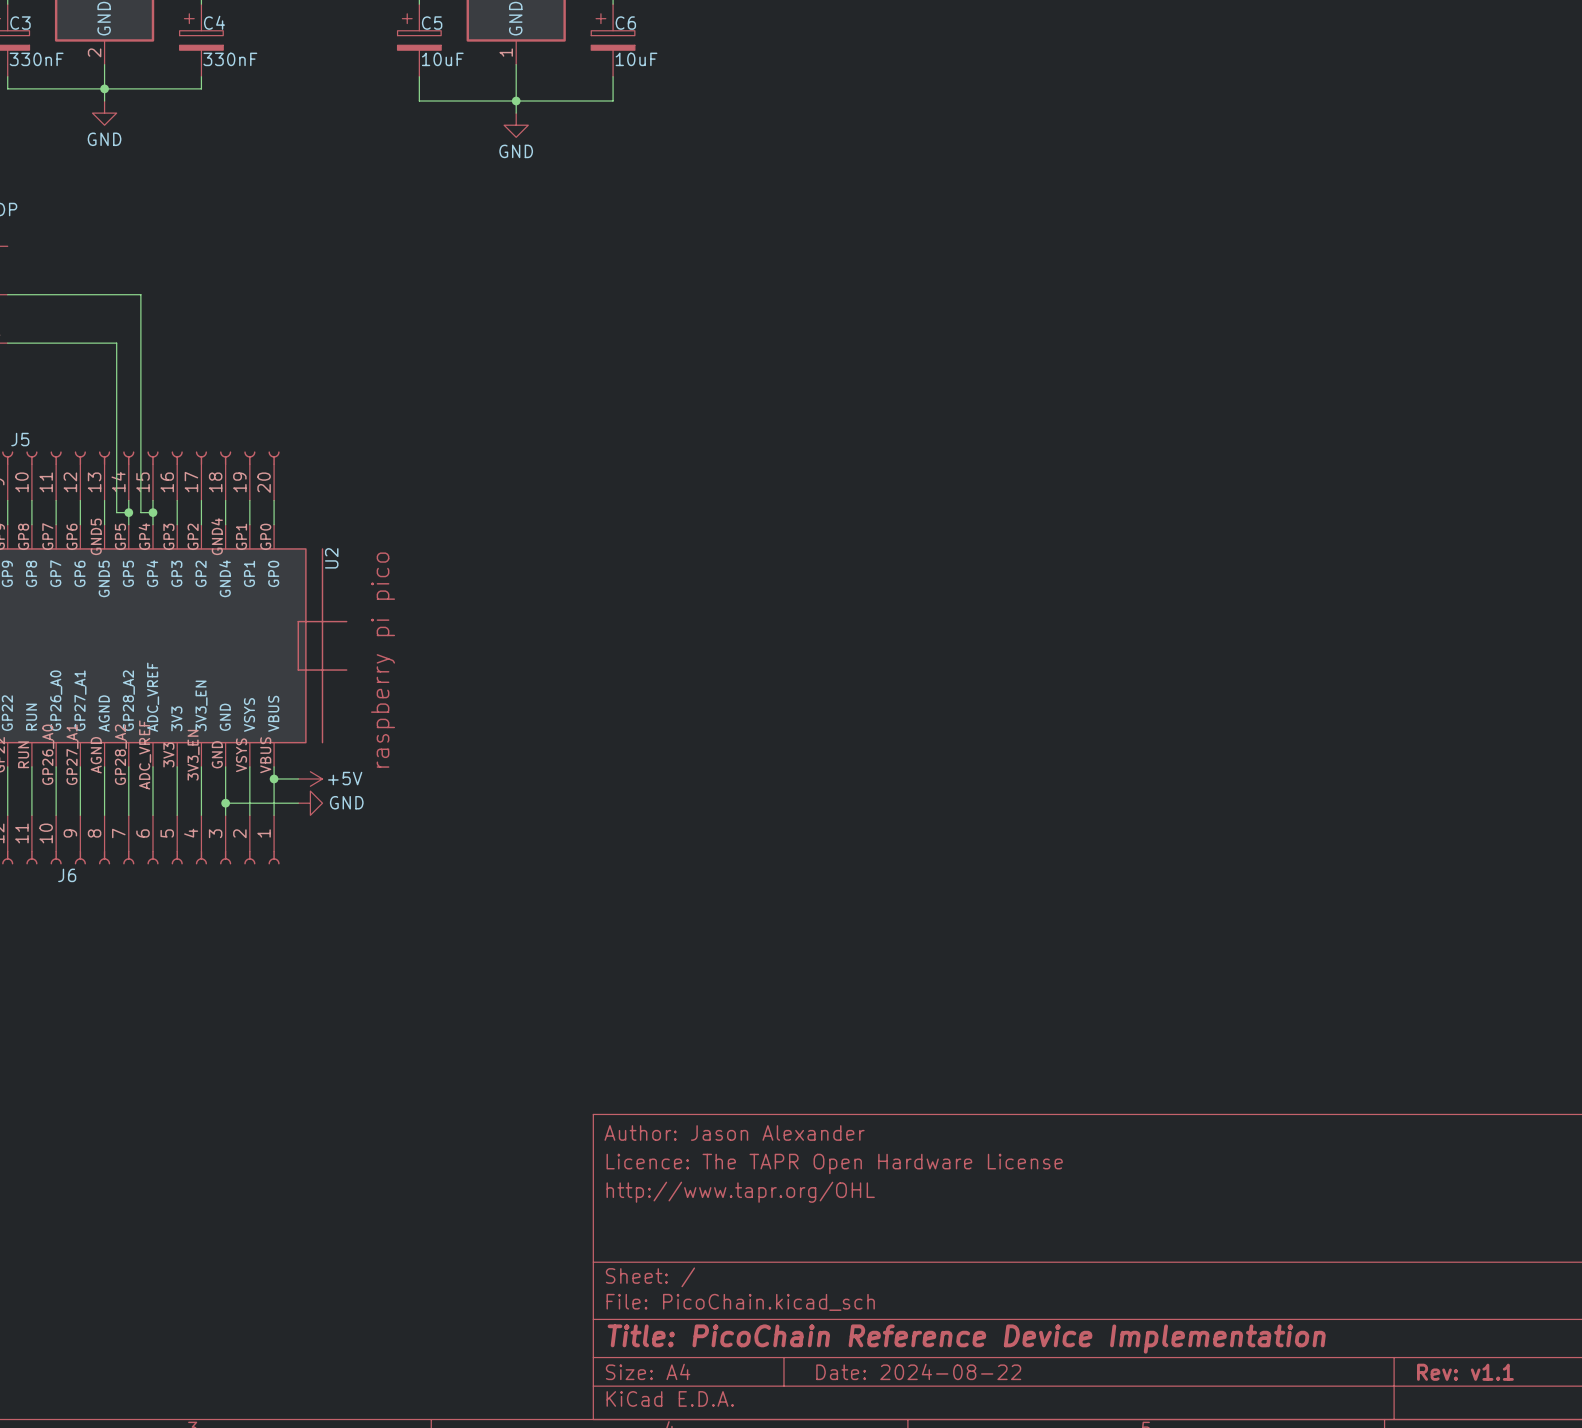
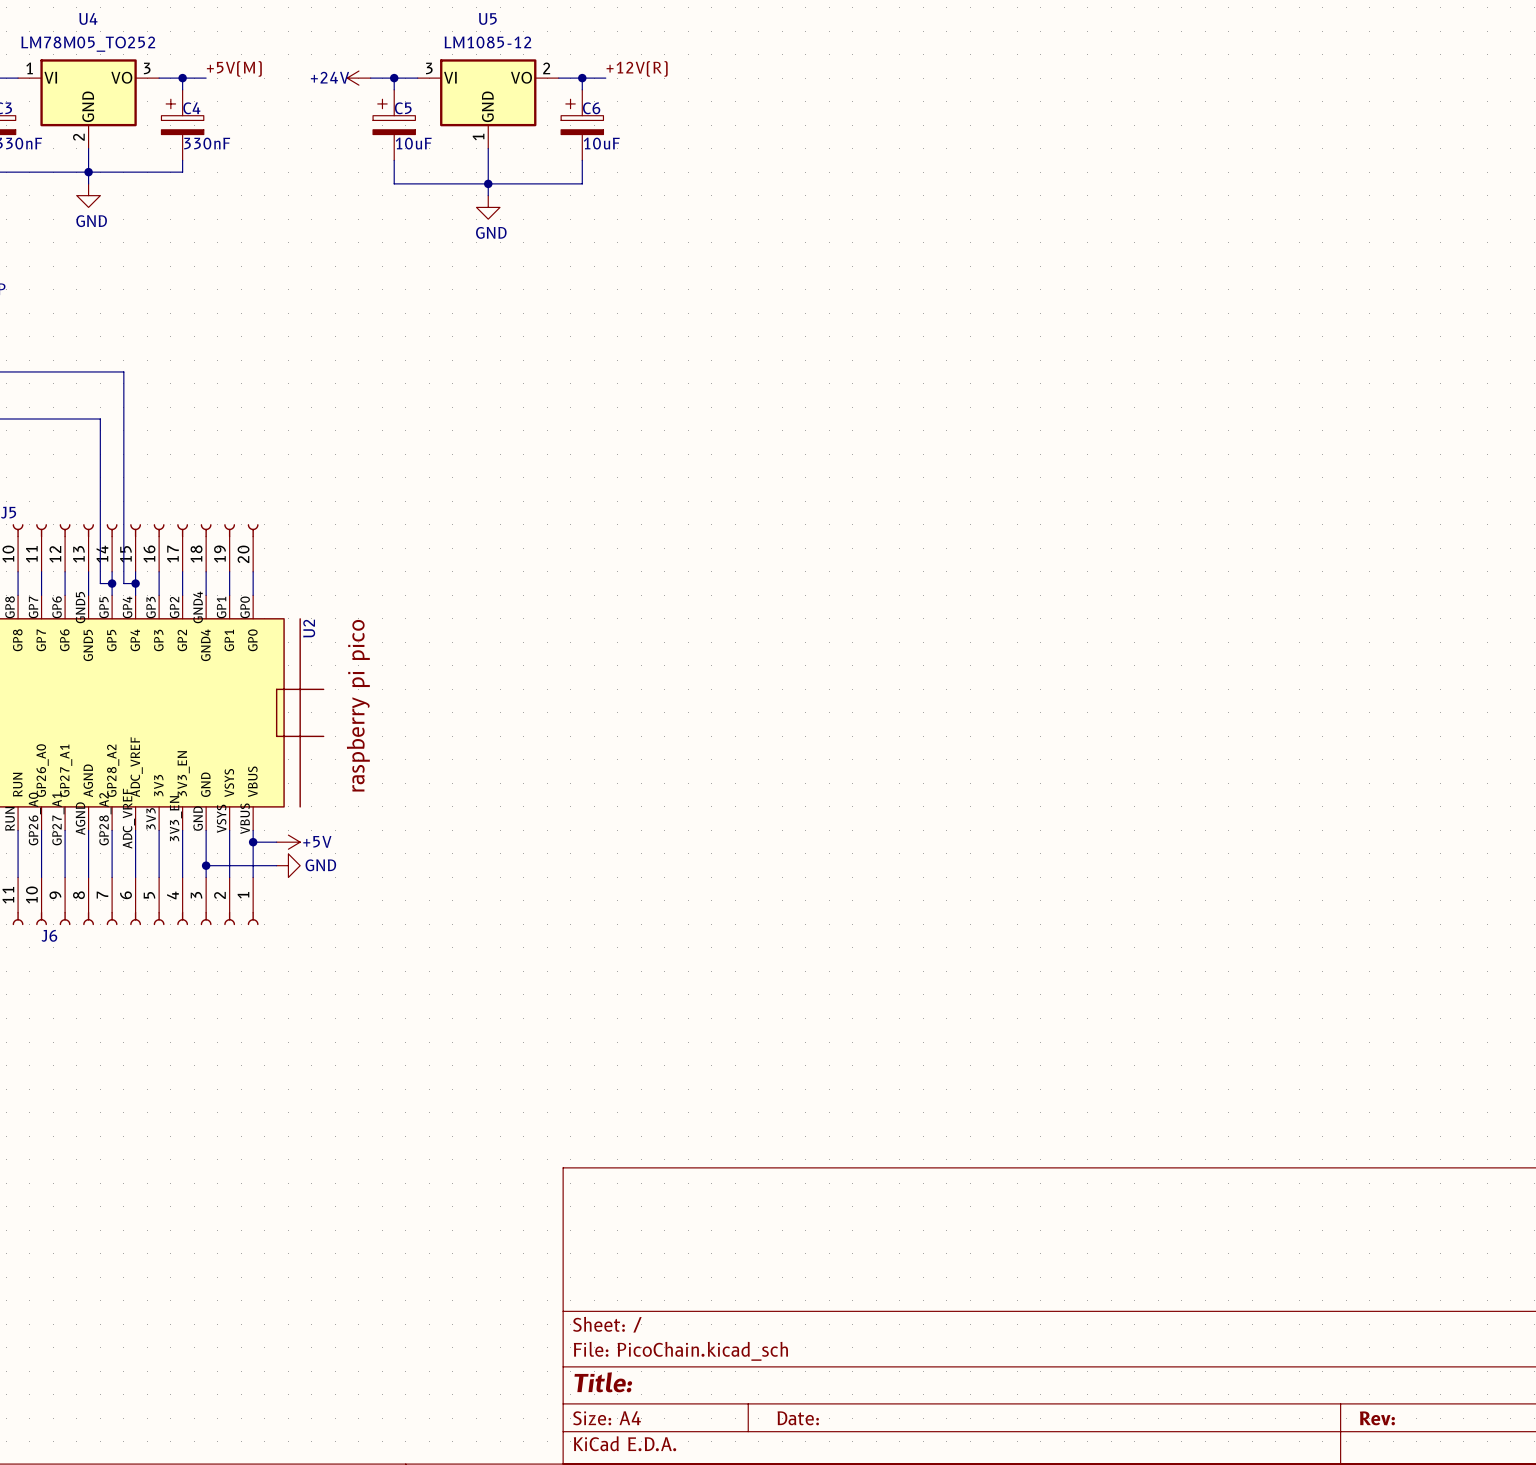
title block: Author: Jason Alexander (734, 1132) -> none
title block: Licence: The TAPR Open Hardware License (834, 1163) -> none
title block: http://www.tapr.org/OHL (740, 1192) -> none
title block: Title: PicoChain Reference Device Implementation (966, 1339) -> Title: (603, 1382)
title block: Date: 2024-08-22 (918, 1371) -> Date: (798, 1418)
title block: Rev: v1.1 (1465, 1372) -> Rev: (1377, 1418)

